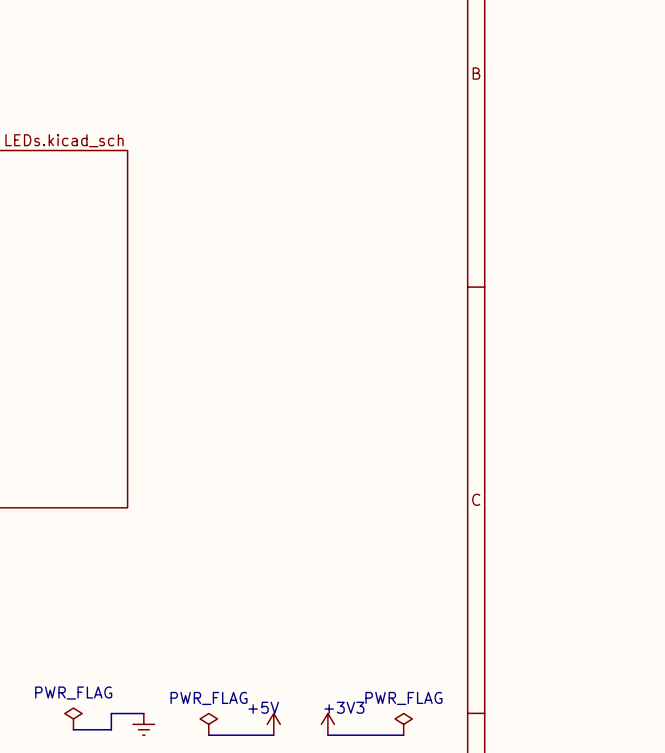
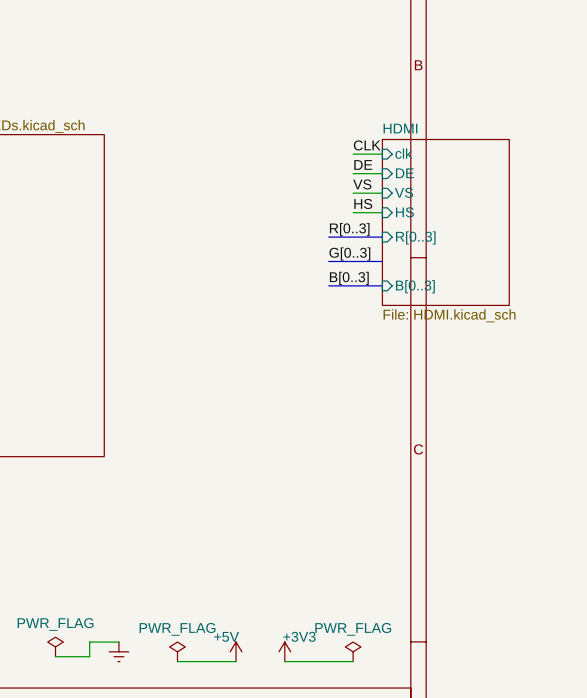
label: none -> CLK (367, 145)
sheet pin: none -> clk (403, 153)
wire: none -> (353, 154) (382, 154)
label: none -> DE (363, 164)
wire: none -> (353, 173) (382, 173)
sheet pin: none -> DE (404, 173)
label: none -> VS (362, 184)
wire: none -> (353, 193) (382, 193)
sheet pin: none -> VS (403, 192)
label: none -> HS (363, 203)
sheet pin: none -> HS (404, 212)
wire: none -> (353, 212) (382, 212)
sheet HDMI: none -> File: HDMI.kicad_sch (445, 222)
label: none -> R[0..3] (349, 229)
bus: none -> (328, 237) (382, 237)
sheet pin: none -> R[0..3] (415, 237)
label: none -> G[0..3] (349, 253)
bus: none -> (328, 261) (382, 261)
label: none -> B[0..3] (349, 278)
bus: none -> (328, 285) (382, 285)
sheet pin: none -> B[0..3] (415, 286)

